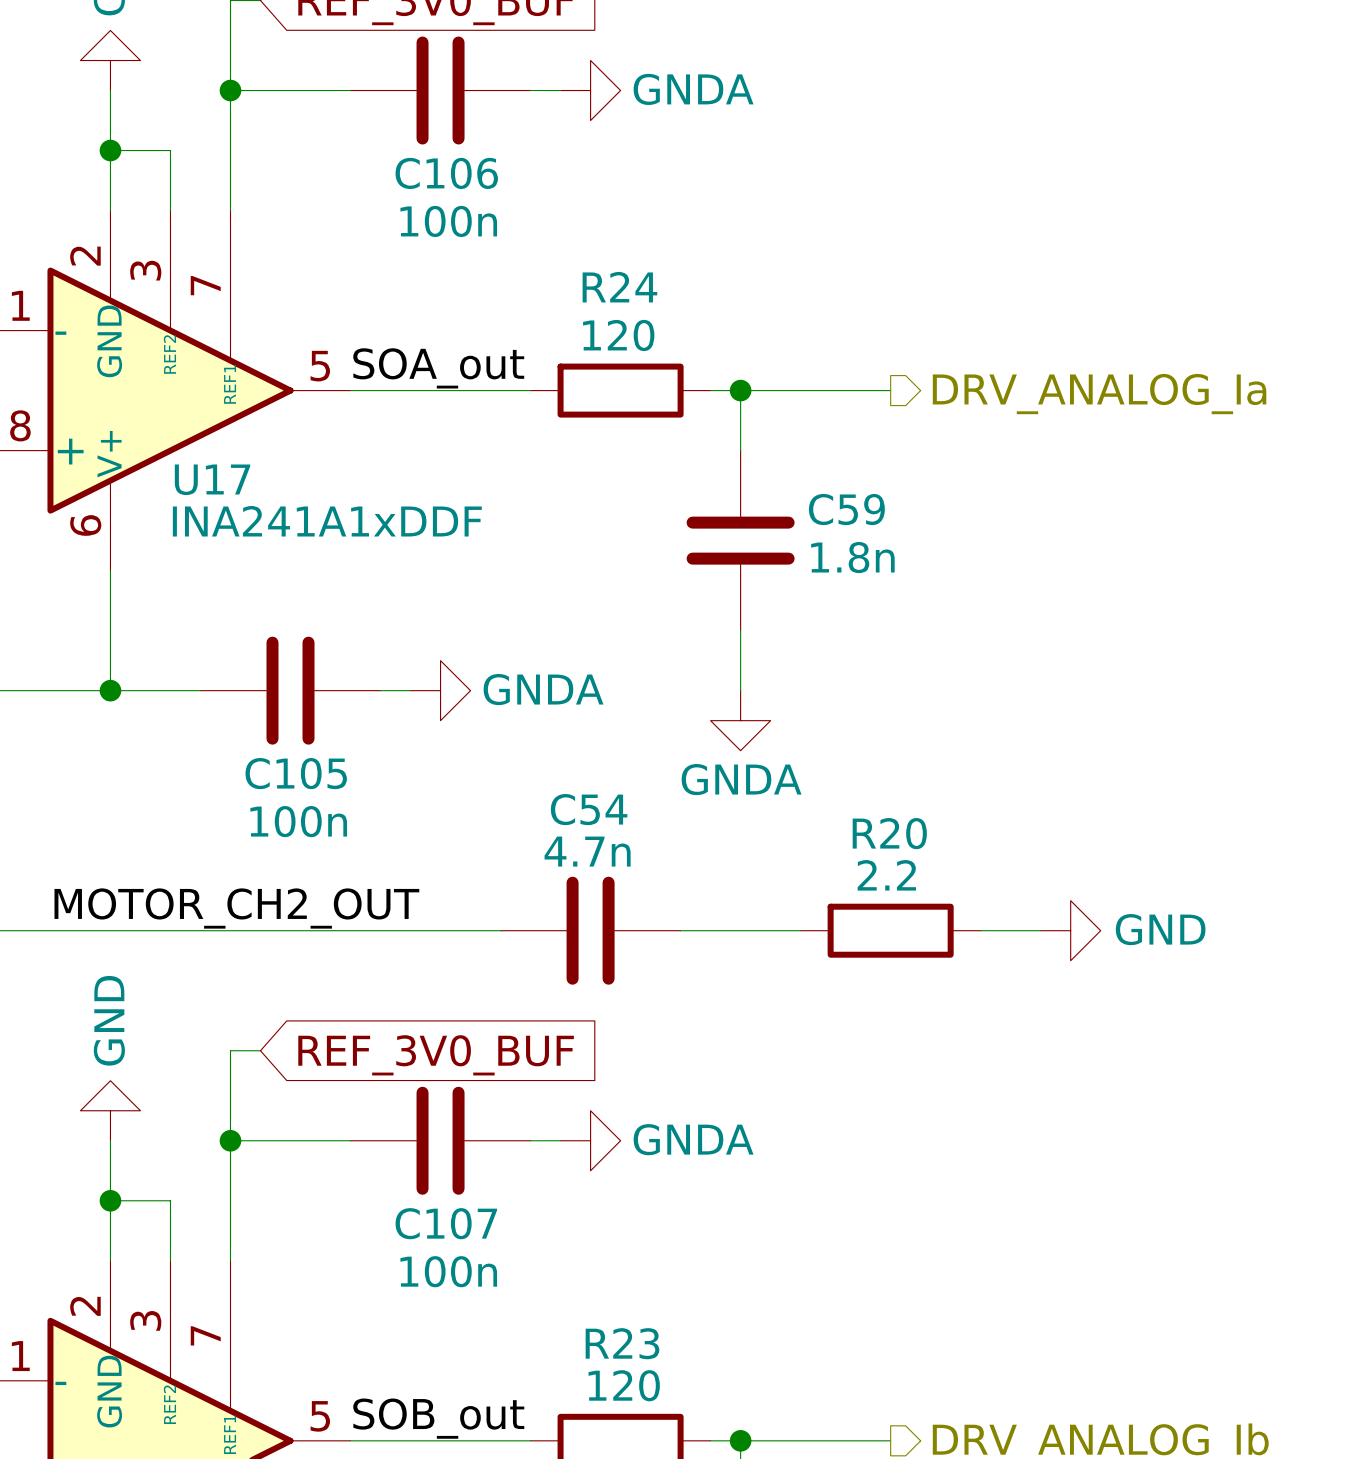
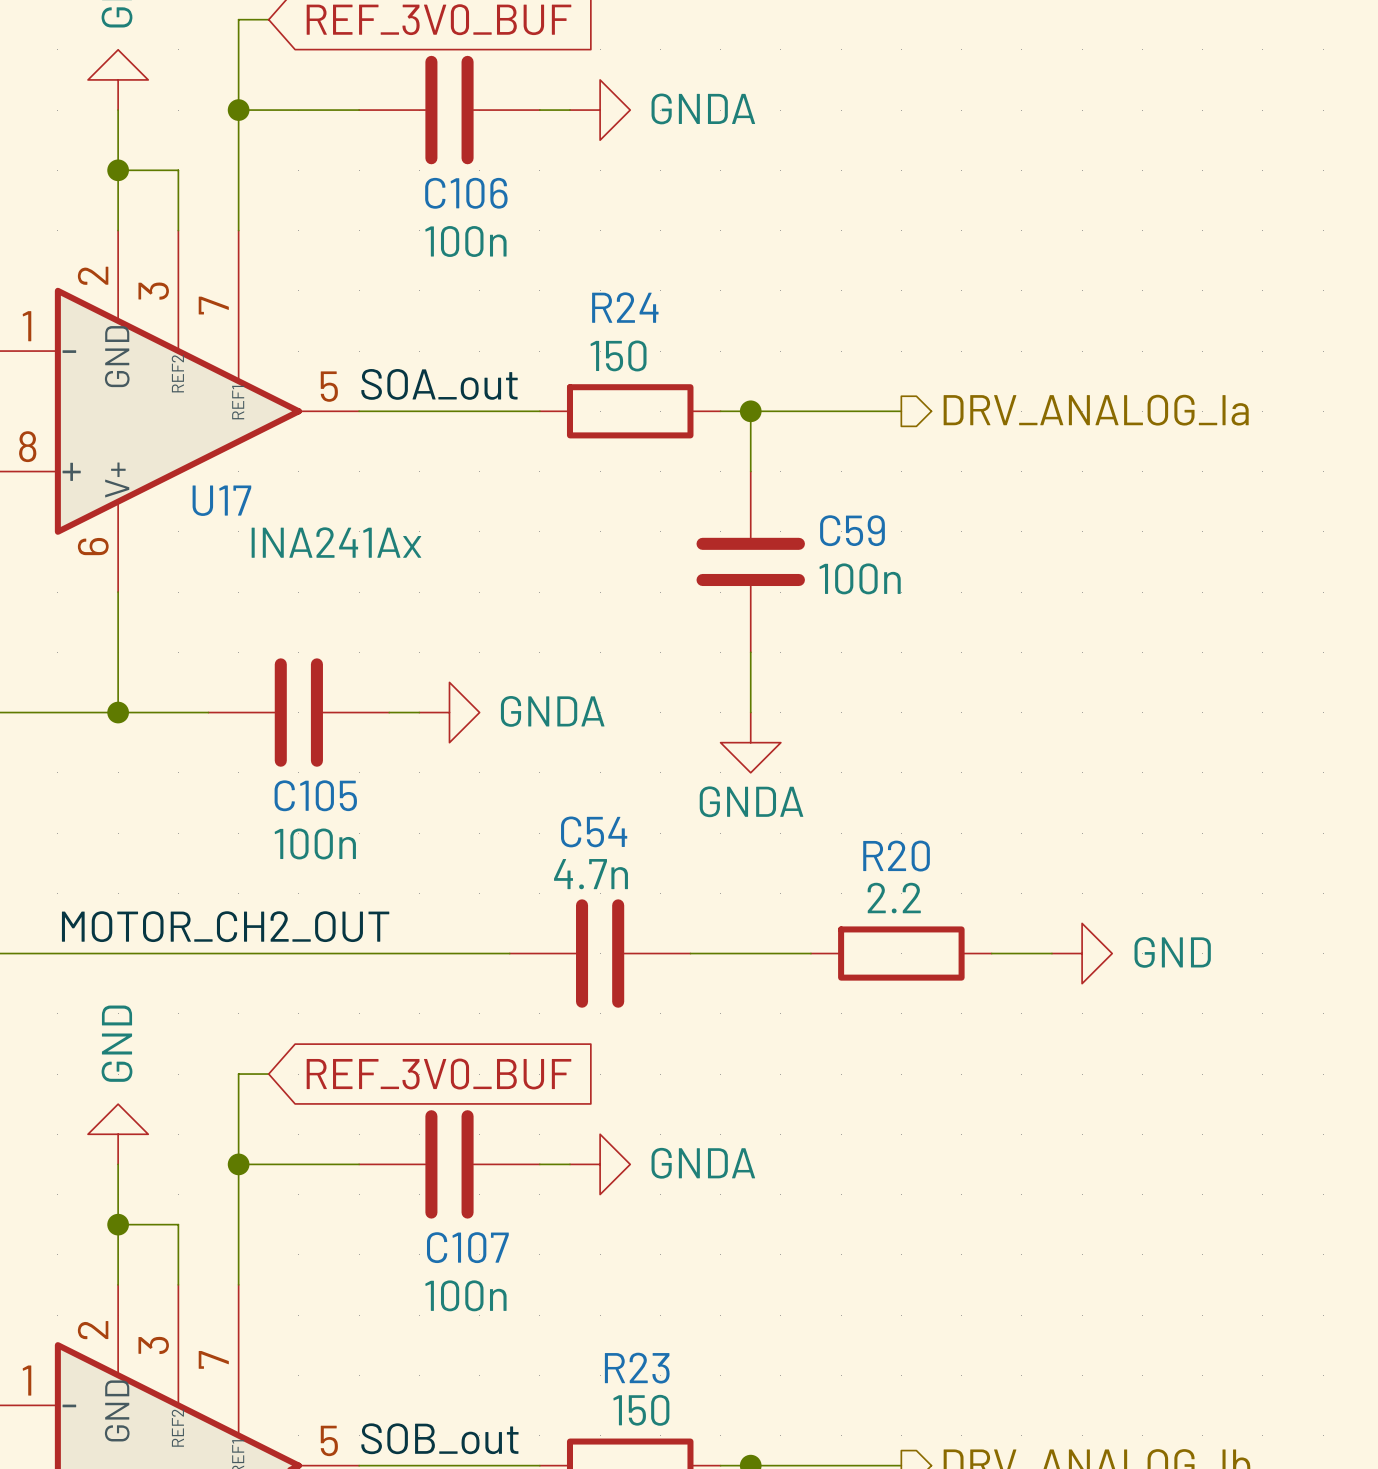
R24 value: 120 (618, 335) -> 150 (618, 355)
U17 value: INA241A1xDDF (327, 521) -> INA241Ax (336, 542)
C59 value: 1.8n (852, 557) -> 100n (860, 578)
R23 value: 120 (624, 1385) -> 150 (641, 1410)

